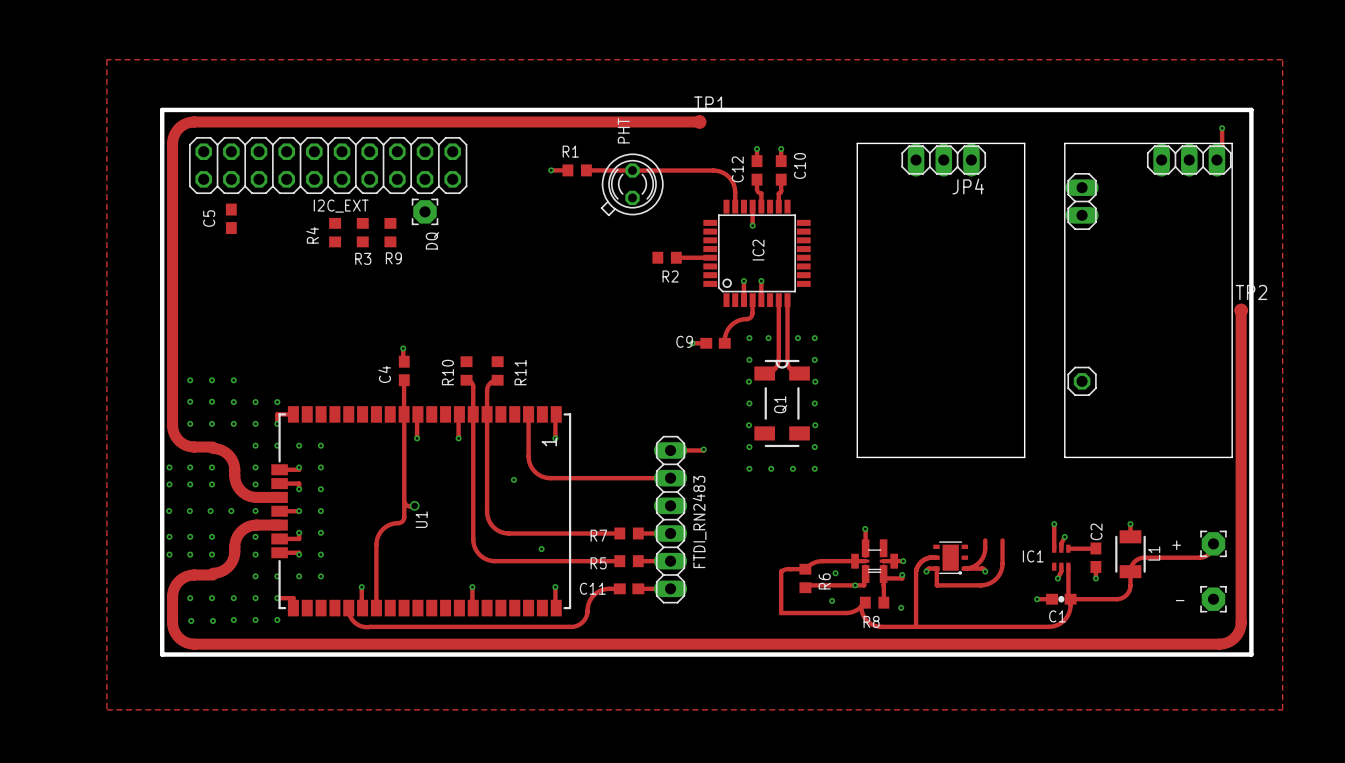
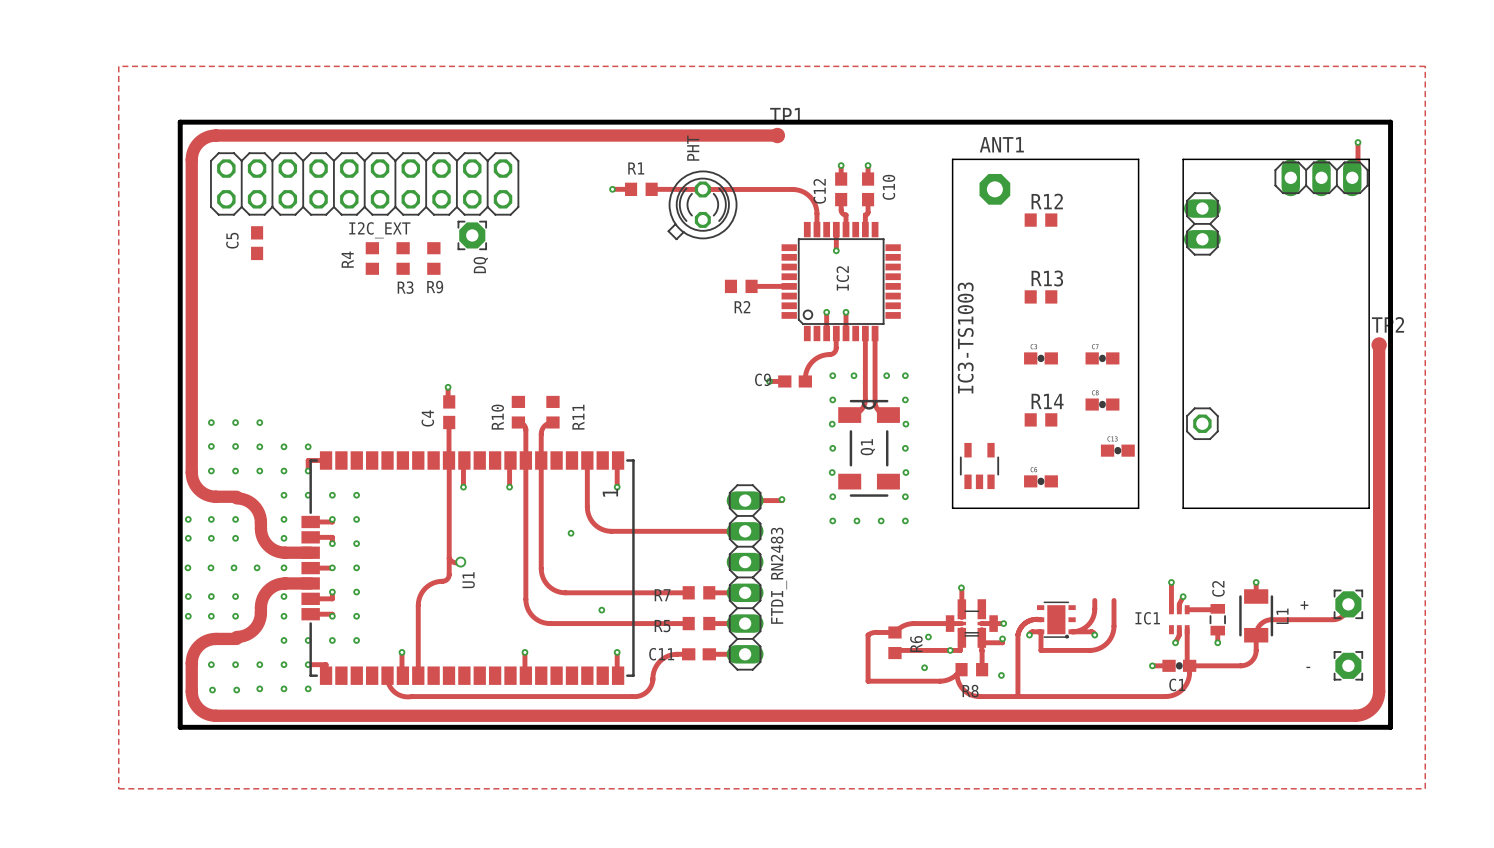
JP4: (943, 160) -> none
ANT1: none -> (994, 189)
R12: none -> (1040, 220)
R13: none -> (1040, 296)
part: none -> (1040, 358)
part: none -> (1102, 358)
part: none -> (1102, 404)
R14: none -> (1040, 419)
part: none -> (1117, 450)
IC3-TS1003: none -> (979, 466)
part: none -> (1040, 481)
C2 footprint: [1090, 542, 1102, 573] -> [1209, 603, 1226, 636]

